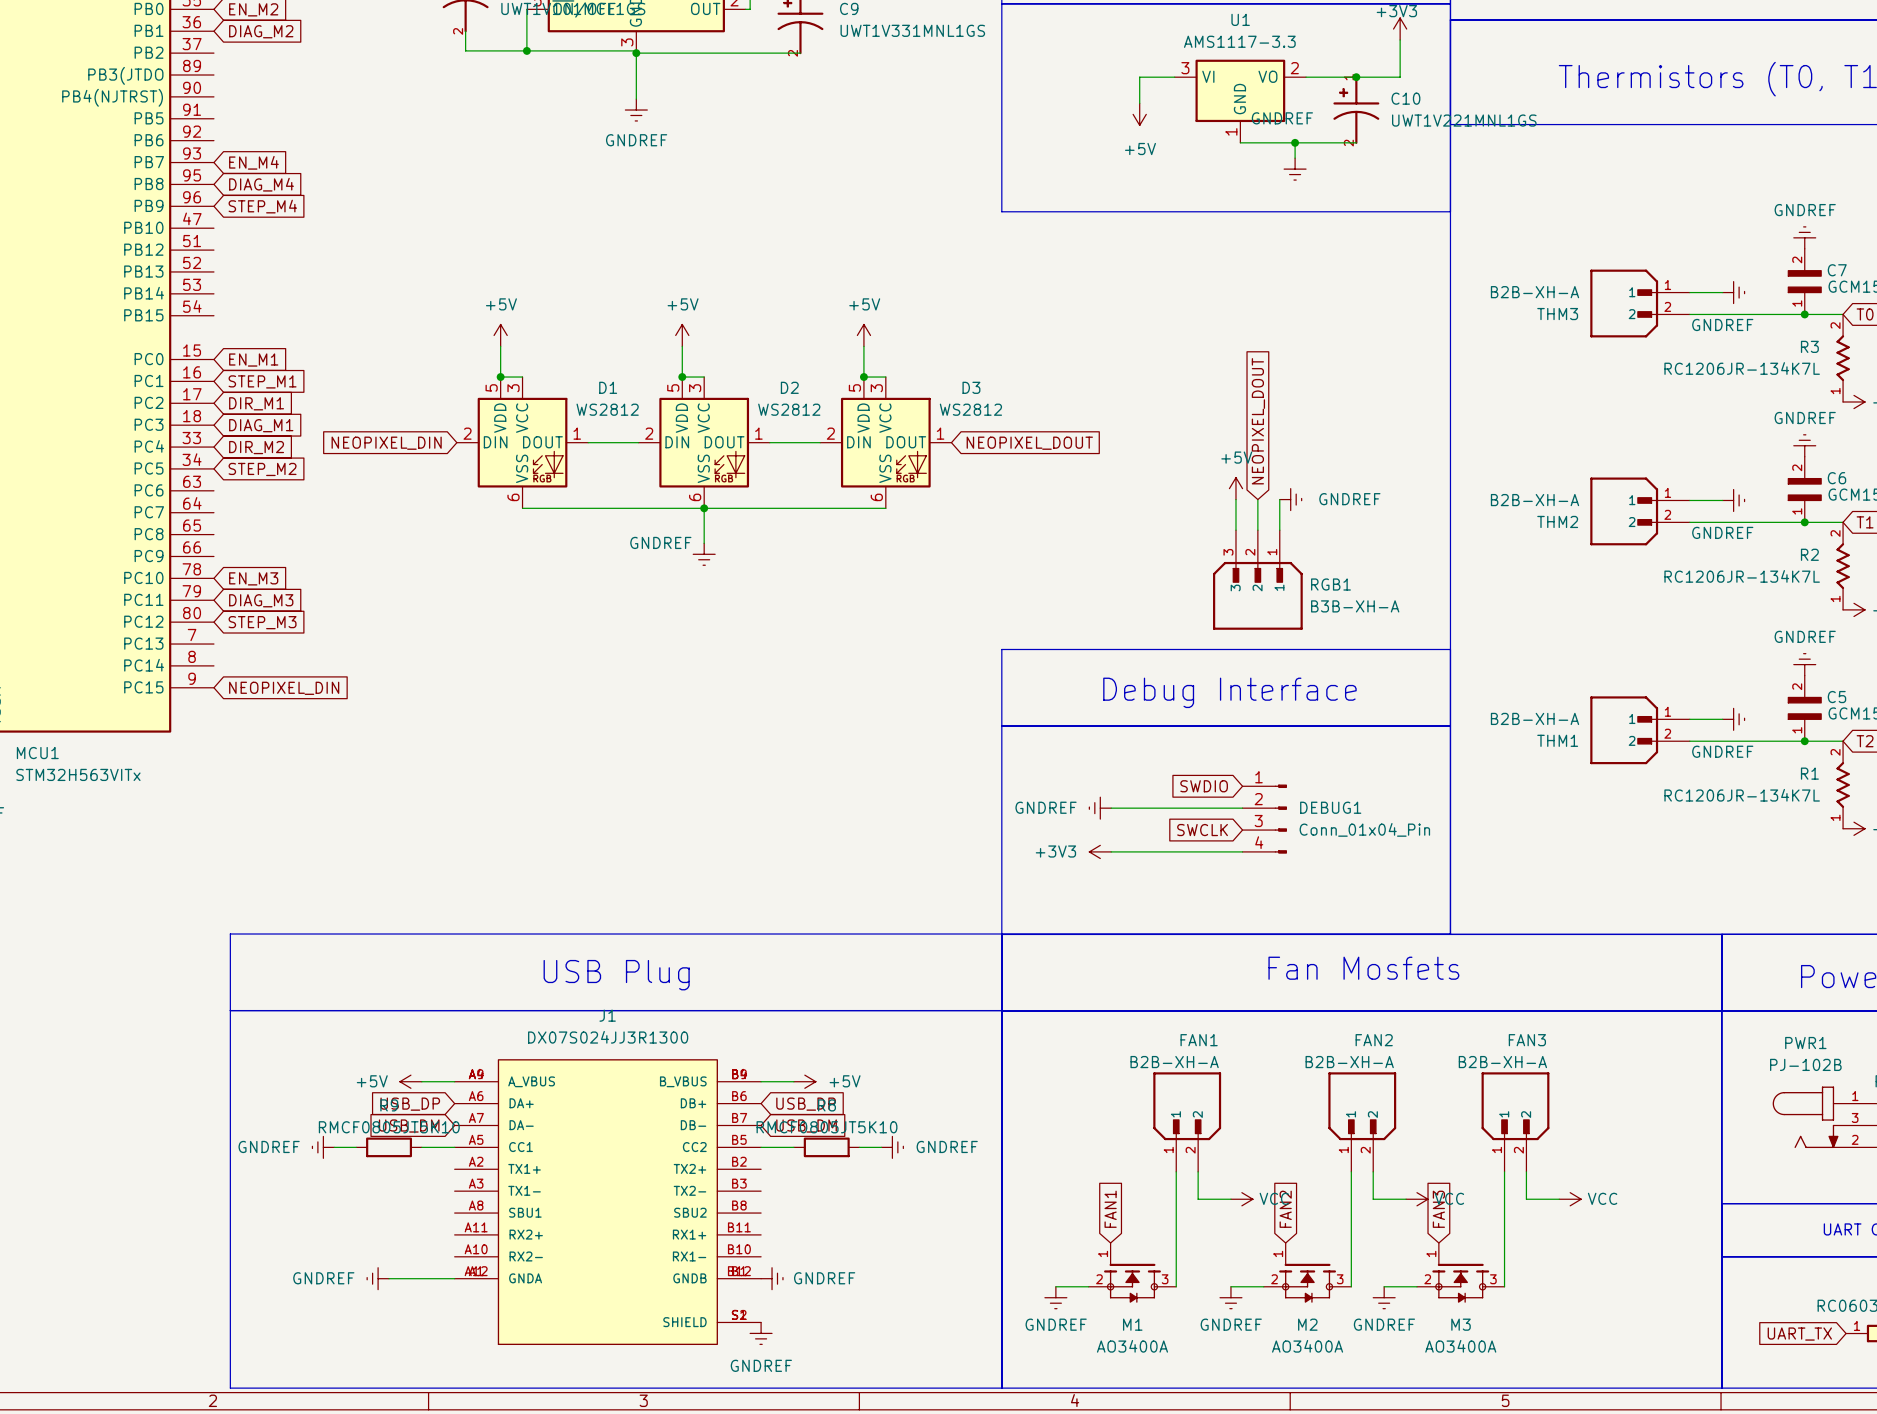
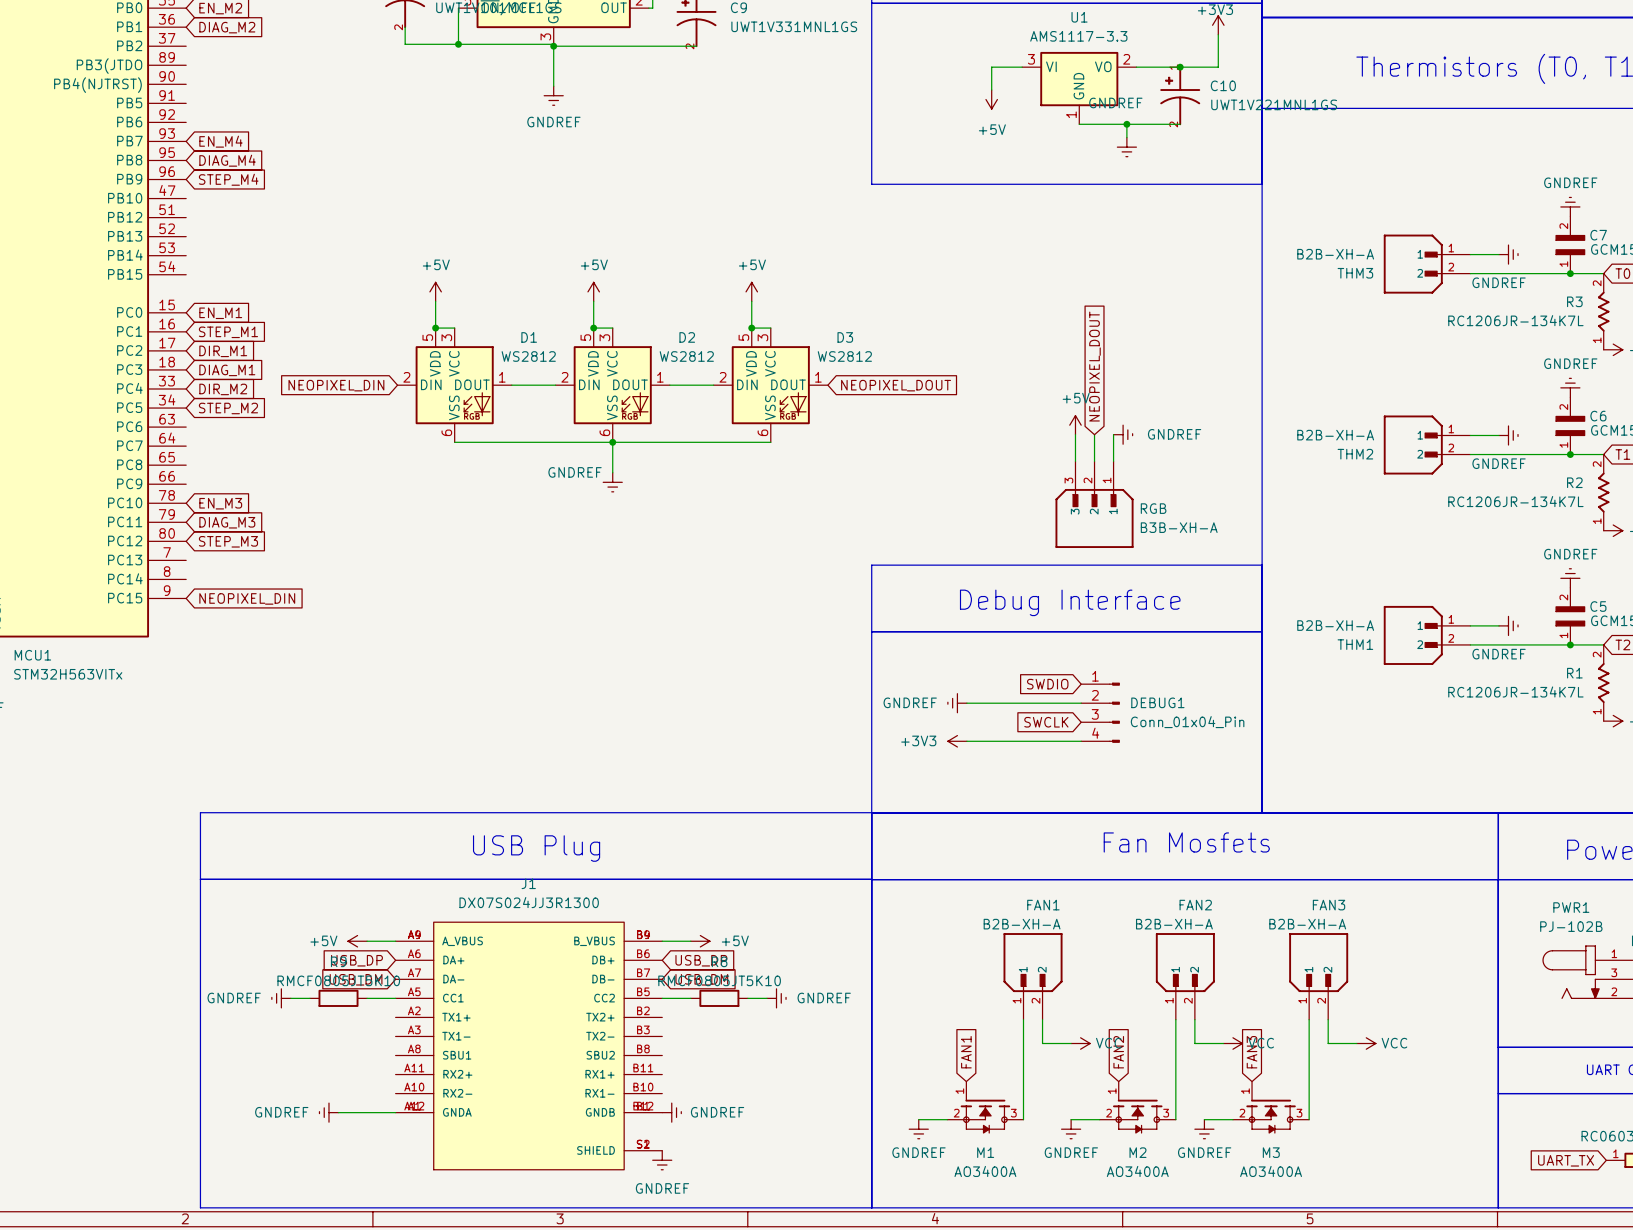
RGB1 name: RGB1 (1330, 584) -> RGB (1153, 508)

